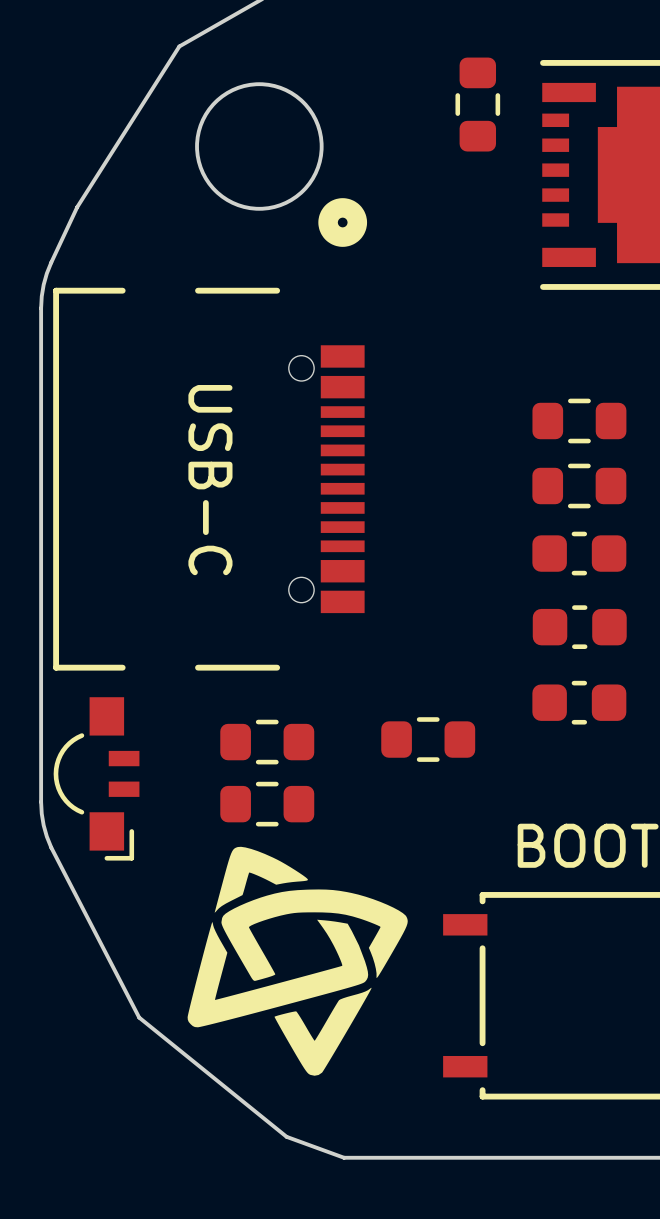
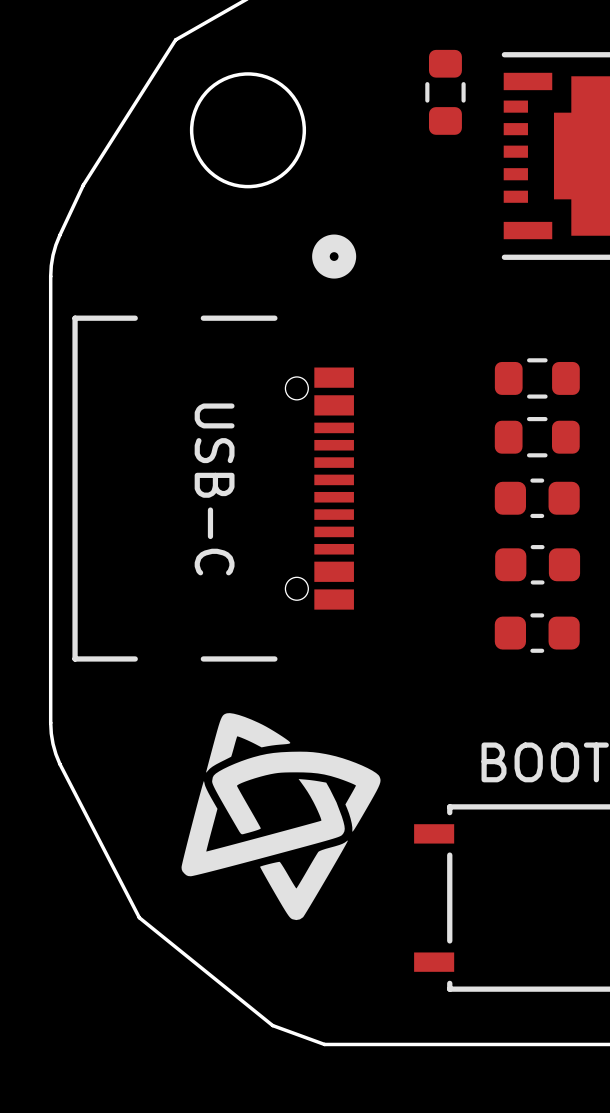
USB-C position: (210, 434) -> (214, 448)
part: (428, 739) -> none
part: (267, 742) -> none
part: (96, 778) -> none
part: (267, 804) -> none
drawing position: (297, 961) -> (281, 816)

